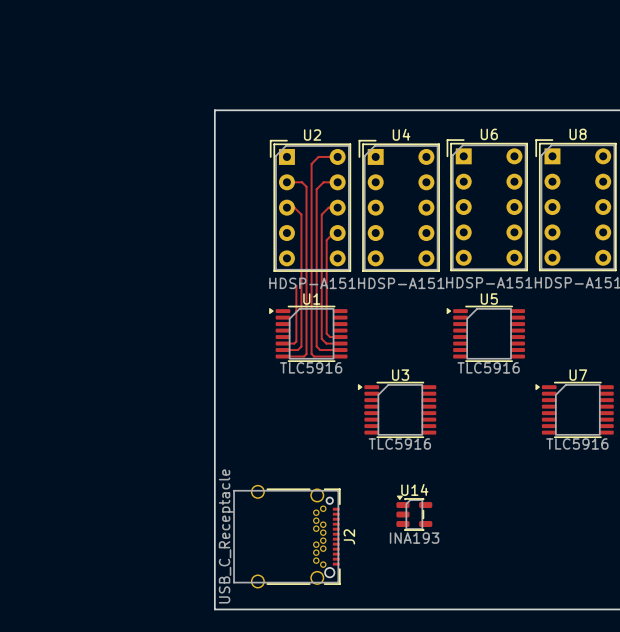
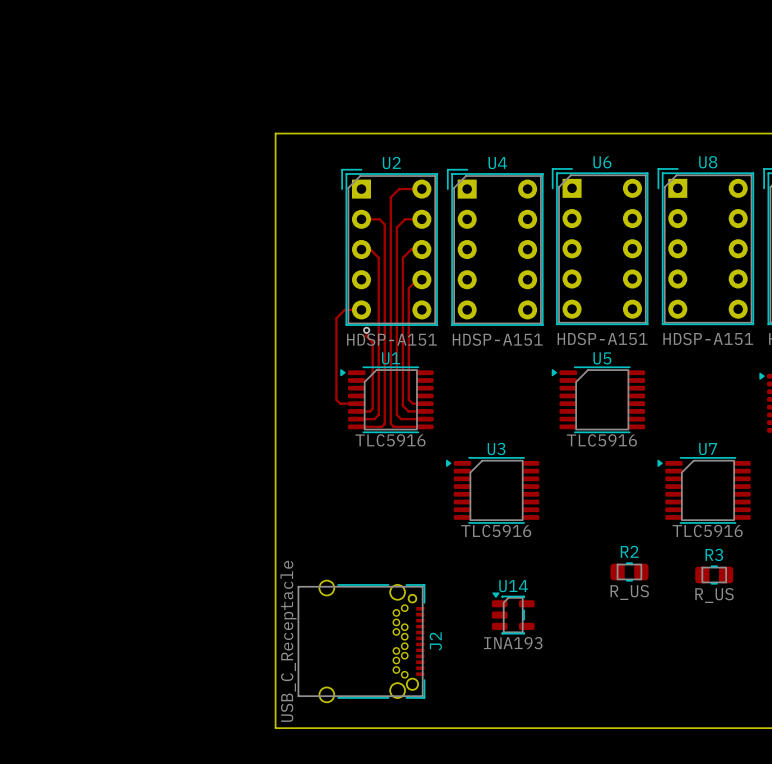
track: none -> (361, 309) (344, 309) (336, 318) (336, 399) (340, 403) (356, 403)
track: none -> (366, 330) (366, 336) (372, 342)
via: none -> (366, 330)
R2: none -> R_US (629, 571)
R3: none -> R_US (714, 575)

